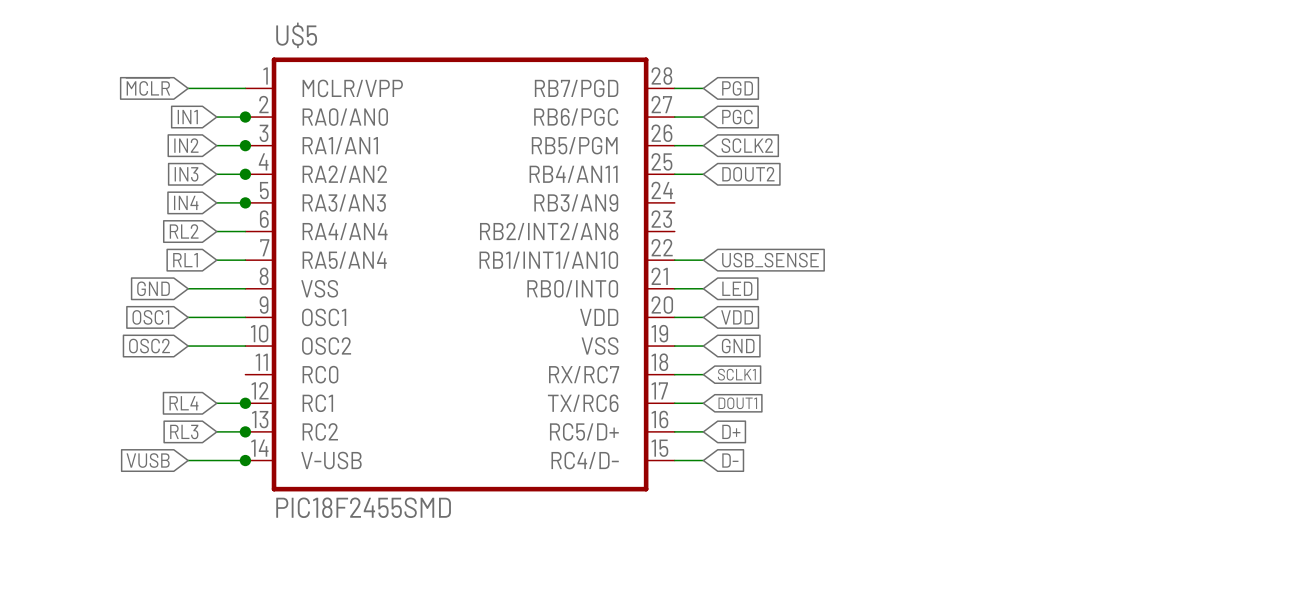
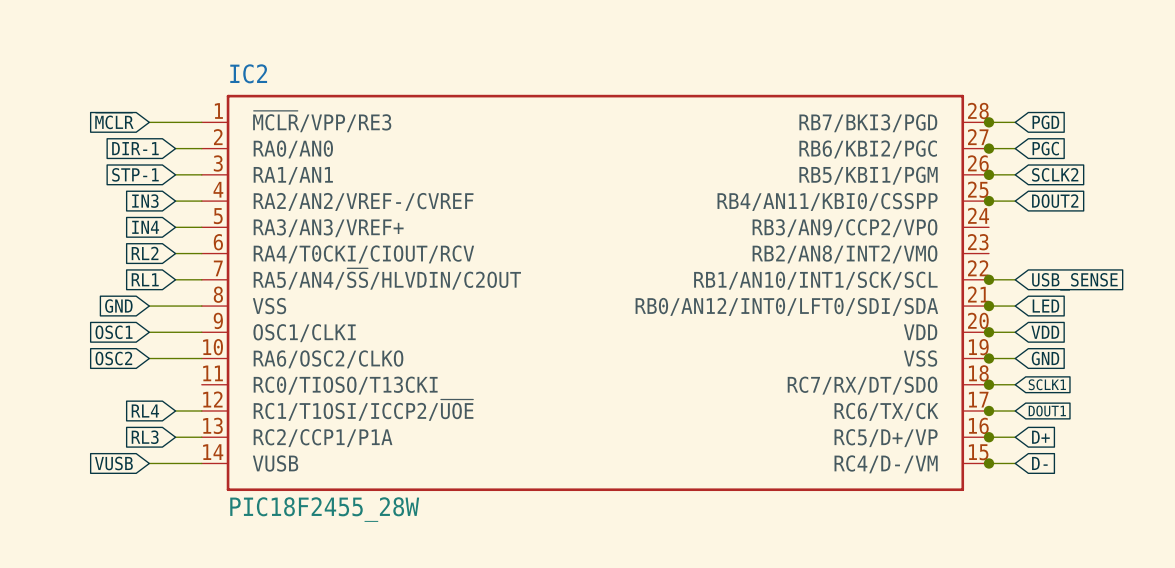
wire: (674, 88) (703, 88) -> none
global label: PGD (737, 88) -> none
wire: none -> (988, 122) (1015, 122)
junction: none -> (988, 122)
global label: none -> PGD (1045, 122)
global label: IN1 (187, 117) -> DIR-1 (135, 148)
junction: (245, 117) -> none
wire: (674, 117) (703, 117) -> none
global label: PGC (737, 117) -> none
wire: none -> (988, 148) (1015, 148)
junction: none -> (988, 148)
global label: none -> PGC (1045, 148)
global label: IN2 (186, 145) -> STP-1 (135, 174)
junction: (245, 145) -> none
wire: (674, 145) (703, 145) -> none
global label: SCLK2 (747, 145) -> none
wire: none -> (988, 174) (1015, 174)
junction: none -> (988, 174)
global label: none -> SCLK2 (1055, 174)
junction: (245, 174) -> none
wire: (674, 174) (703, 174) -> none
global label: DOUT2 (748, 174) -> none
wire: none -> (988, 201) (1015, 201)
junction: none -> (988, 201)
global label: none -> DOUT2 (1055, 201)
junction: (245, 202) -> none
wire: (674, 260) (703, 260) -> none
global label: USB_SENSE (770, 260) -> none
wire: none -> (988, 279) (1015, 279)
junction: none -> (988, 279)
global label: none -> USB_SENSE (1074, 281)
U$5: PIC18F2455SMD (460, 274) -> none
IC2: none -> PIC18F2455_28W (595, 292)
wire: (674, 288) (703, 288) -> none
global label: LED (737, 288) -> none
wire: none -> (988, 306) (1015, 306)
junction: none -> (988, 306)
global label: none -> LED (1045, 306)
wire: (674, 317) (703, 317) -> none
global label: VDD (737, 317) -> none
wire: none -> (988, 332) (1015, 332)
junction: none -> (988, 332)
global label: none -> VDD (1045, 332)
wire: (674, 346) (703, 346) -> none
global label: GND (738, 346) -> none
wire: none -> (988, 358) (1015, 358)
junction: none -> (988, 358)
global label: none -> GND (1045, 358)
wire: (674, 374) (703, 374) -> none
global label: SCLK1 (736, 374) -> none
wire: none -> (988, 384) (1015, 384)
junction: none -> (988, 384)
global label: none -> SCLK1 (1047, 384)
junction: (245, 403) -> none
wire: (674, 403) (703, 403) -> none
global label: DOUT1 (737, 403) -> none
wire: none -> (988, 410) (1015, 410)
junction: none -> (988, 410)
global label: none -> DOUT1 (1047, 411)
junction: (245, 431) -> none
wire: (674, 431) (703, 431) -> none
global label: D+ (731, 431) -> none
wire: none -> (988, 437) (1015, 437)
junction: none -> (988, 437)
global label: none -> D+ (1040, 437)
junction: (245, 460) -> none
wire: (674, 460) (703, 460) -> none
global label: D- (730, 460) -> none
wire: none -> (988, 463) (1015, 463)
junction: none -> (988, 463)
global label: none -> D- (1039, 463)

